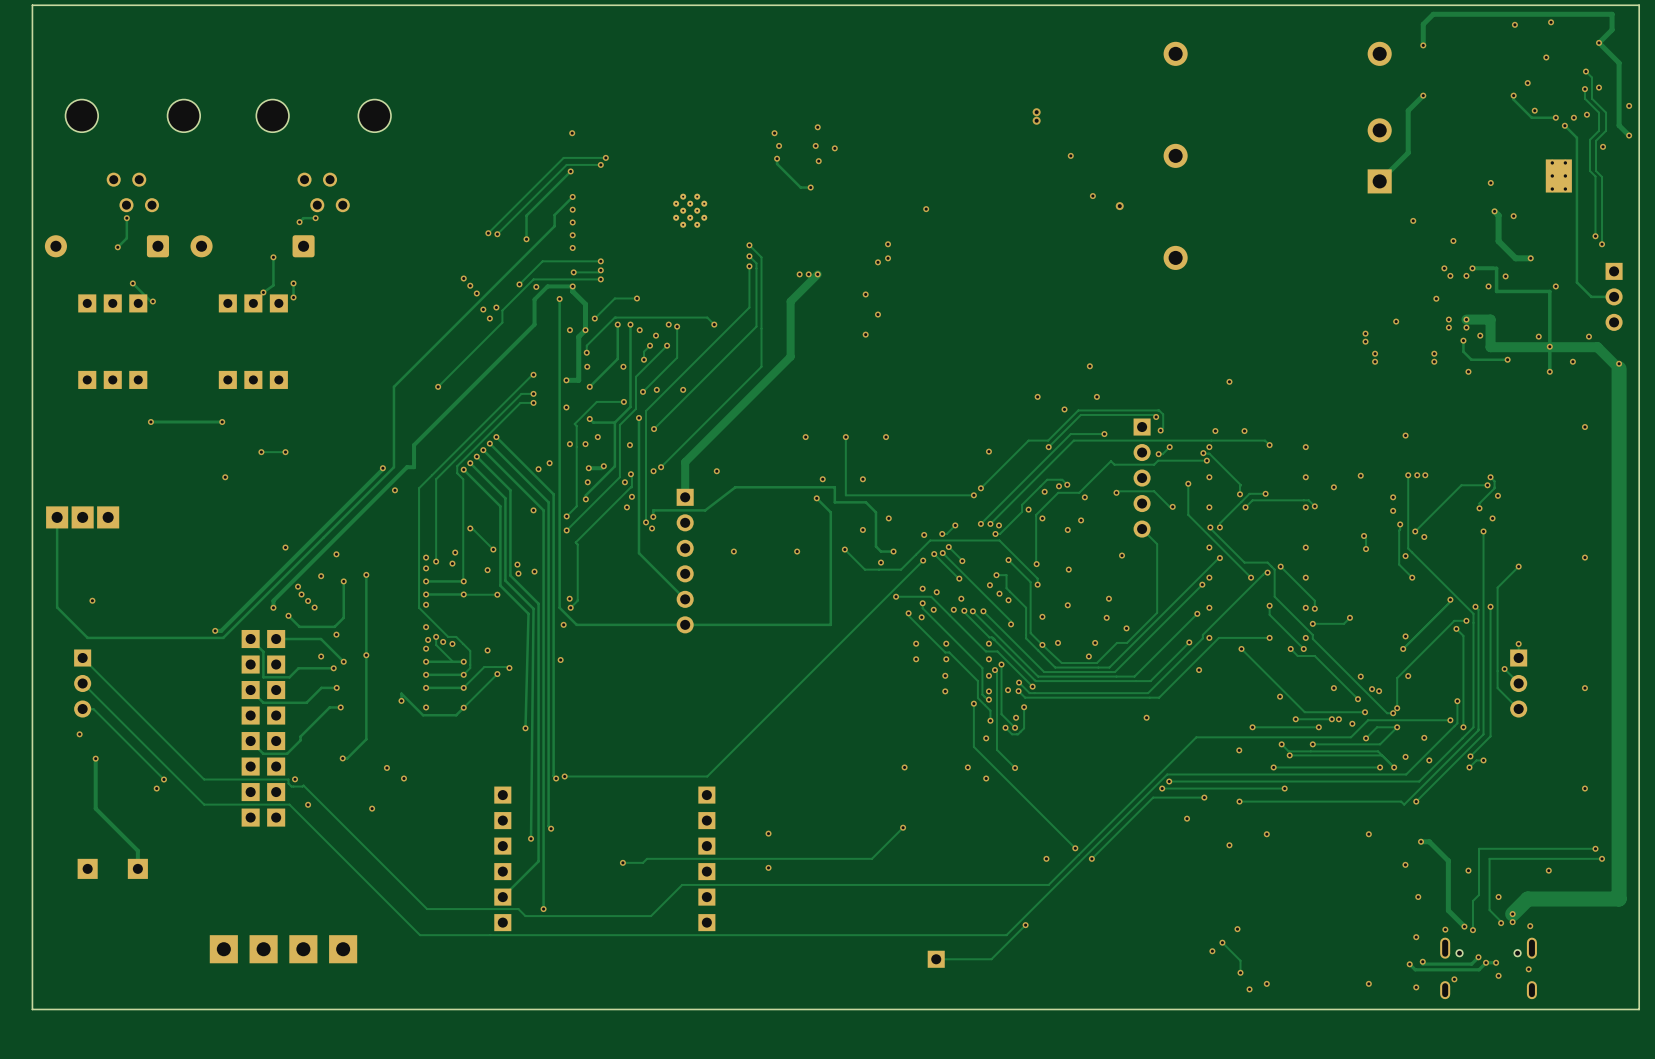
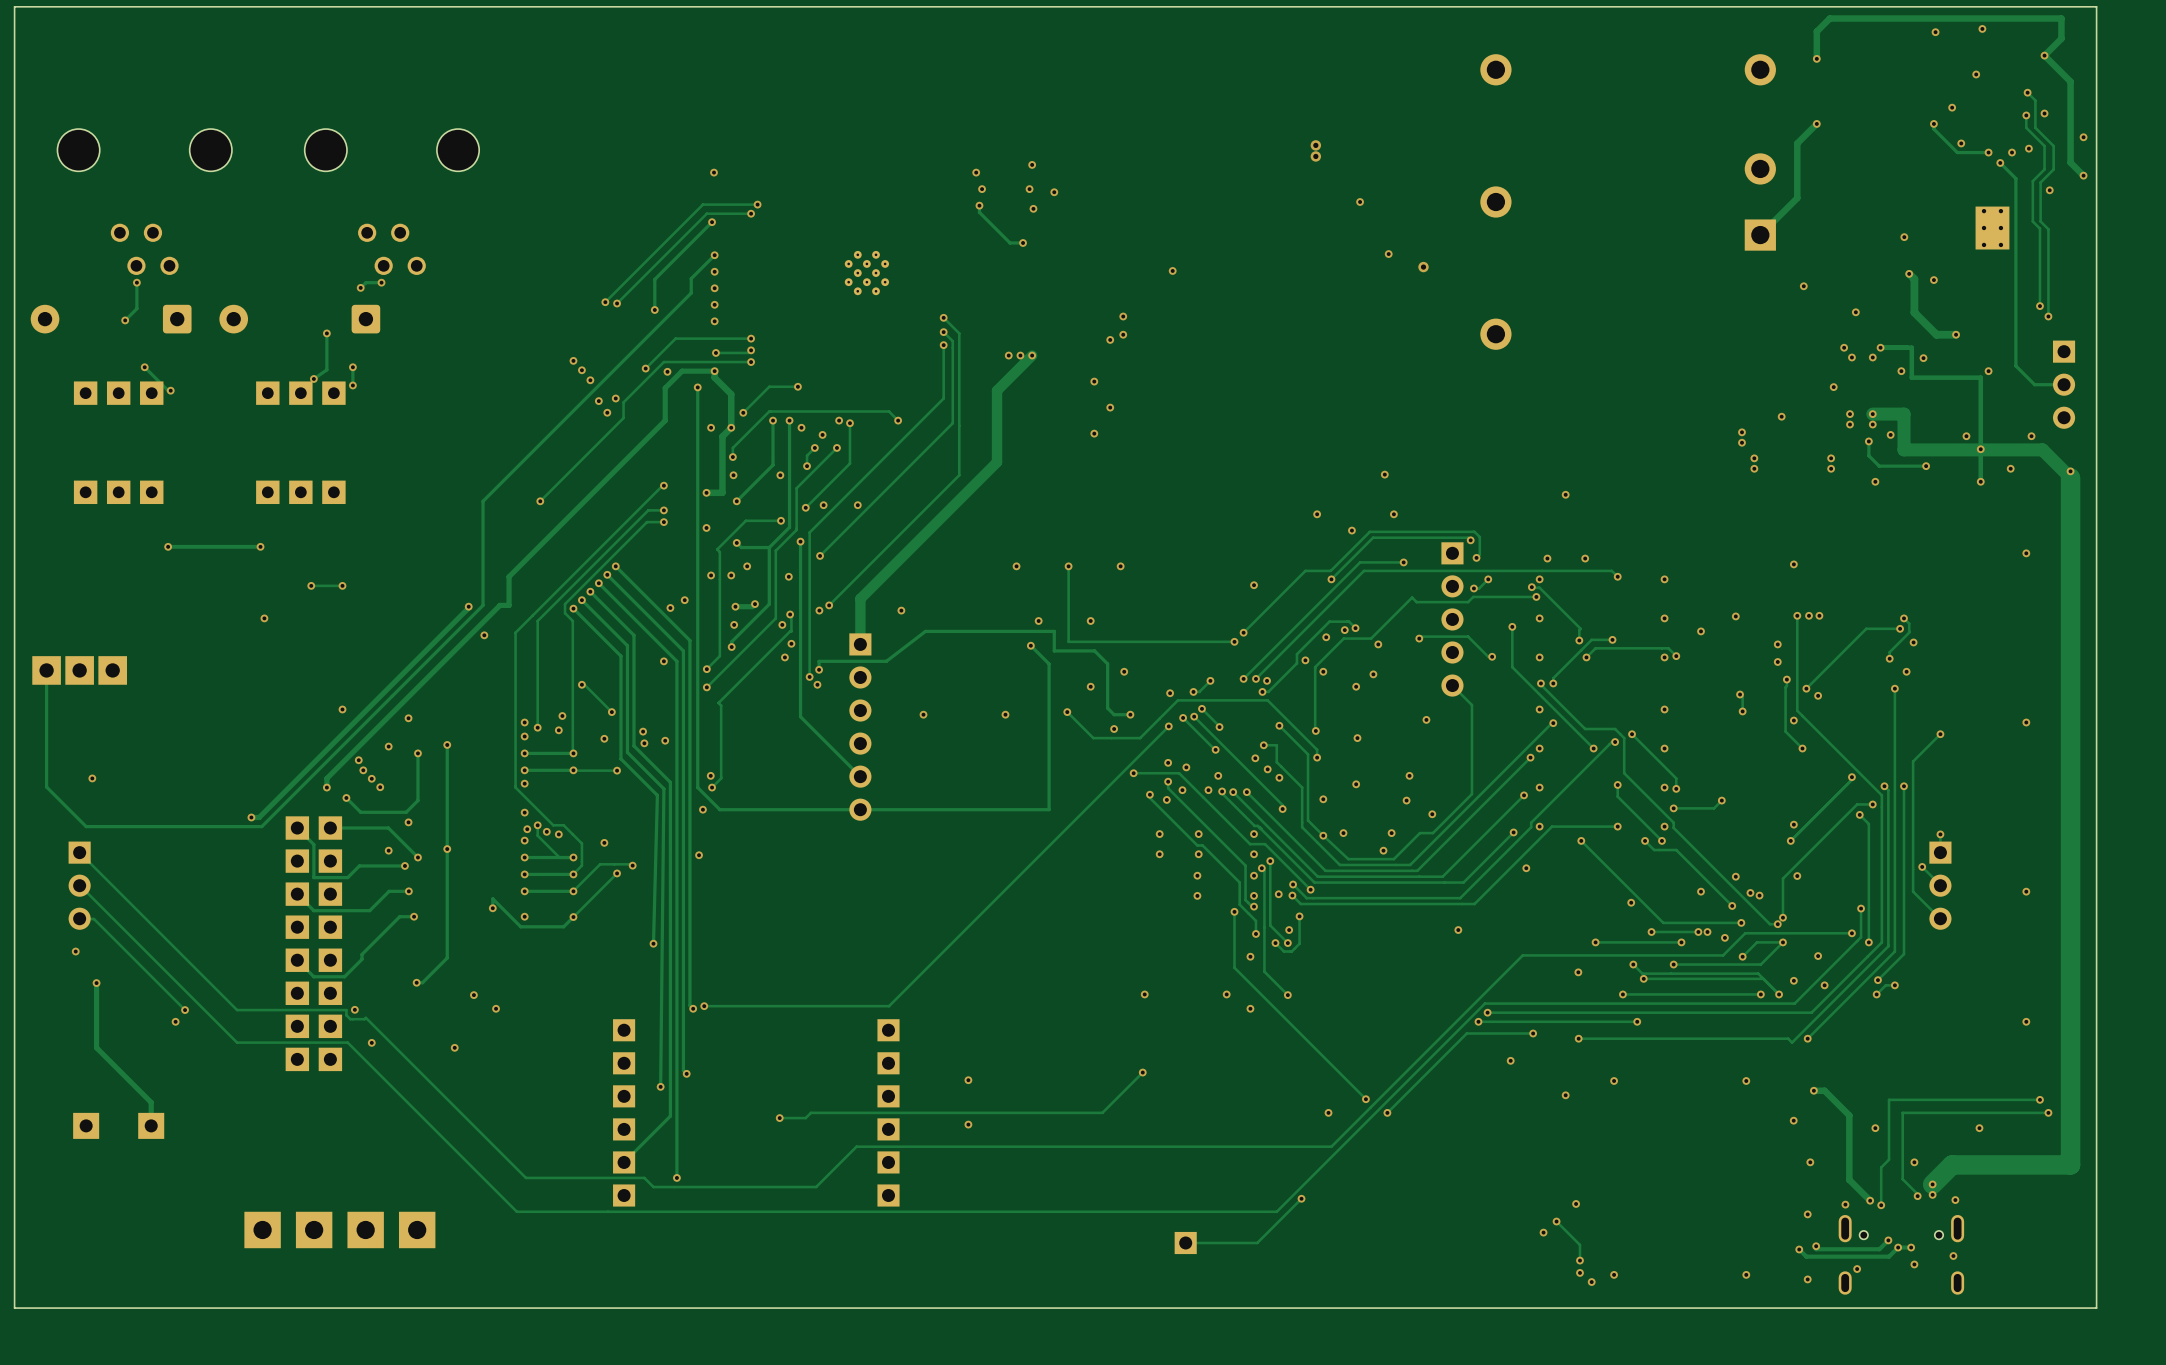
via: none -> (1579, 1272)

